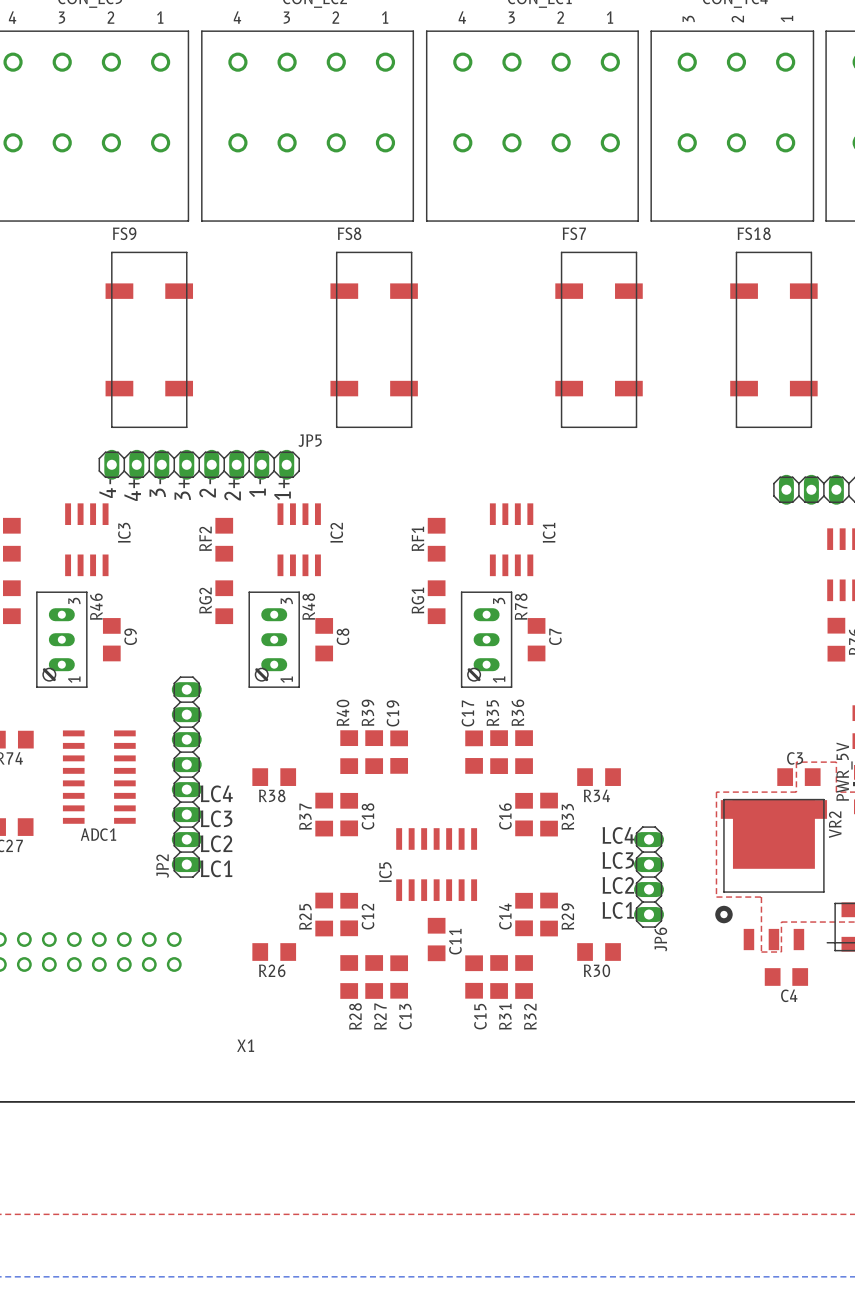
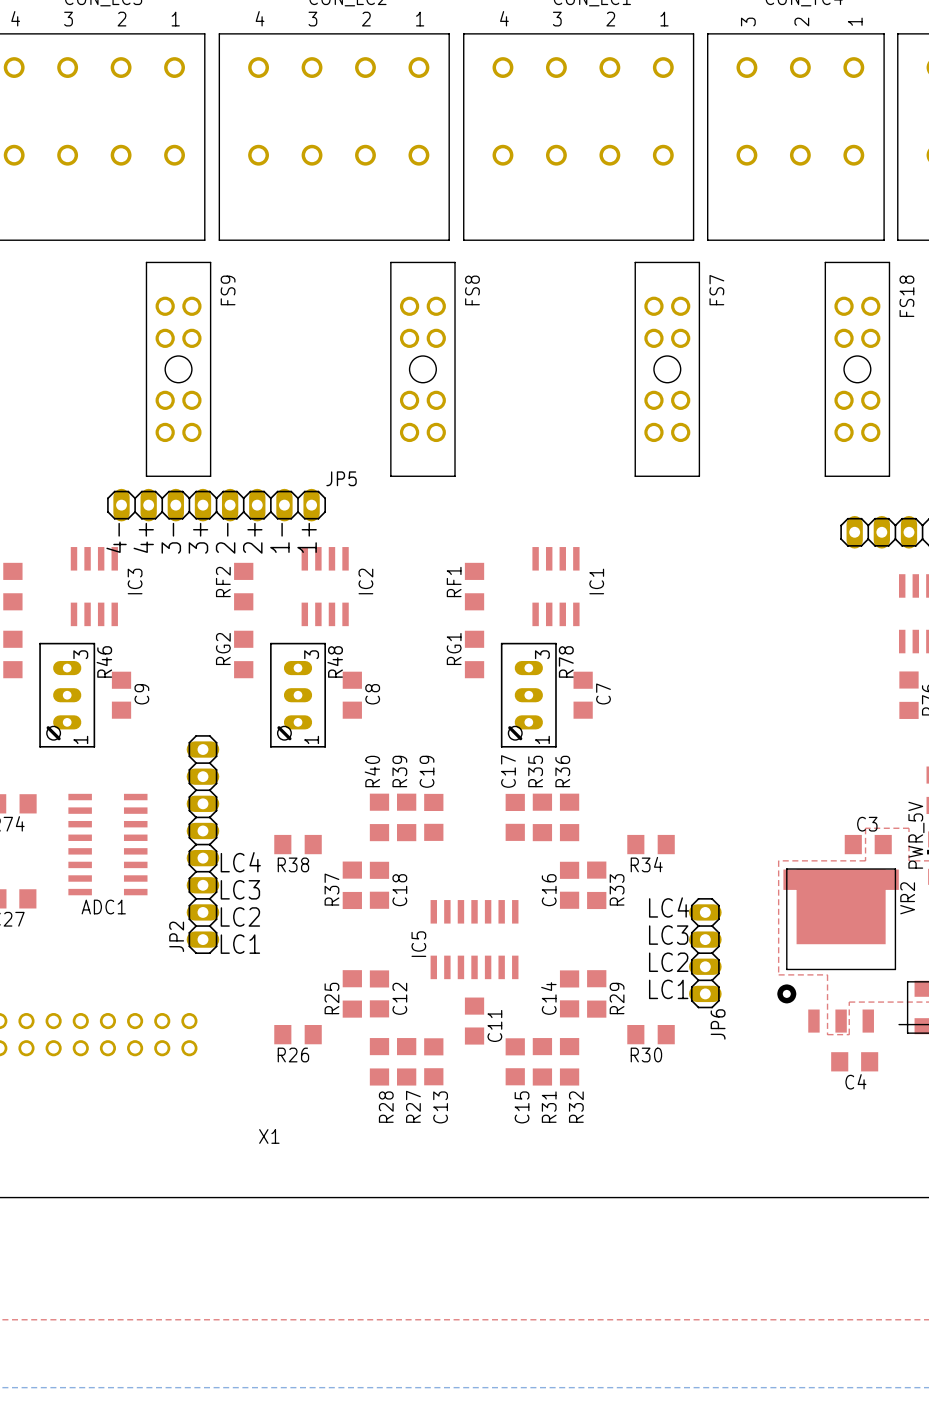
FS9 name position: FS9 (124, 233) -> FS9 (228, 290)
FS8 name position: FS8 (349, 233) -> FS8 (472, 290)
FS7 name position: FS7 (574, 233) -> FS7 (716, 290)
FS18 name position: FS18 (754, 233) -> FS18 (906, 296)
FS9 footprint: [105, 251, 194, 428] -> [145, 261, 212, 477]
FS8 footprint: [330, 251, 418, 428] -> [390, 261, 456, 477]
FS7 footprint: [555, 251, 643, 428] -> [634, 261, 701, 477]
FS18 footprint: [730, 251, 818, 428] -> [824, 261, 891, 477]

